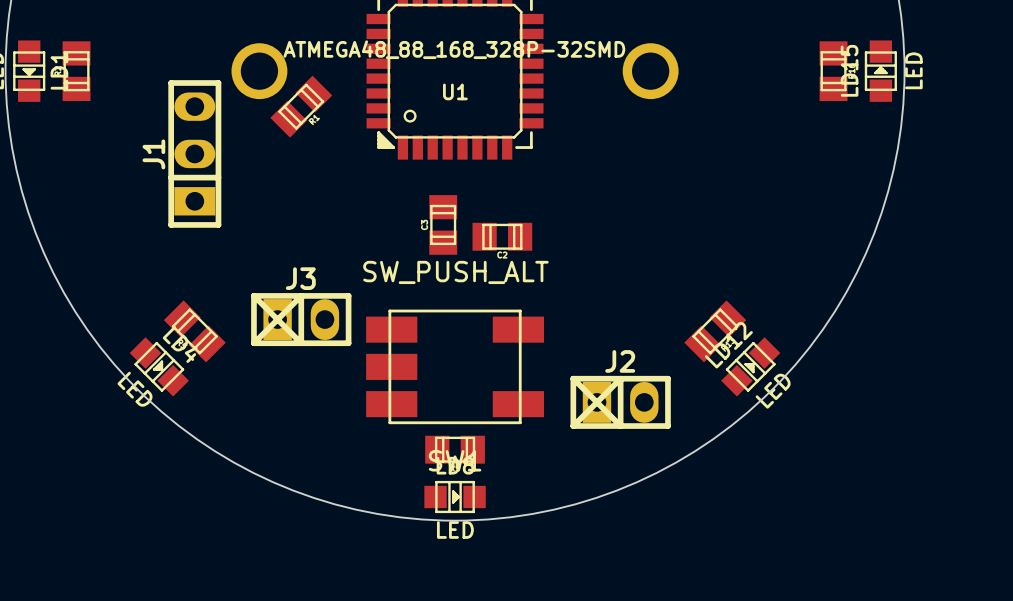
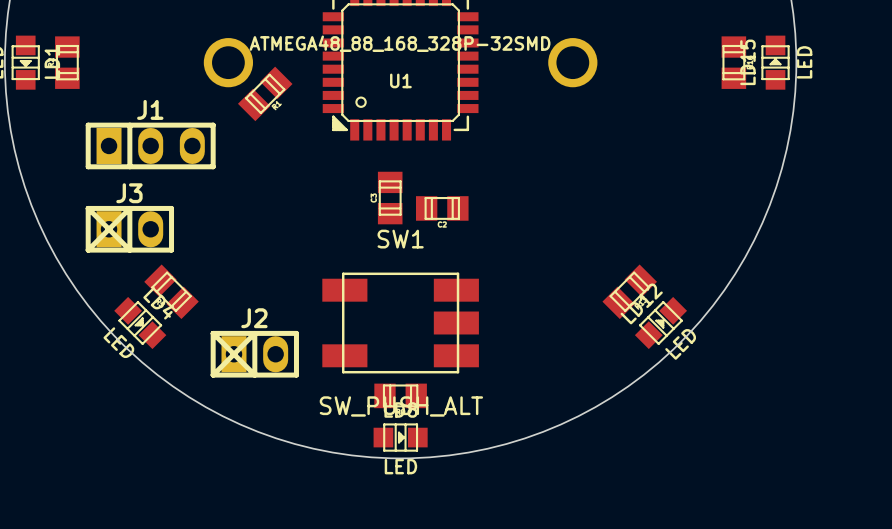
J1 rotation: 0° (194, 153) -> 90° clockwise (150, 145)
J3 position: (301, 319) -> (129, 229)
SW1 rotation: 0° (455, 366) -> 180° (400, 323)
J2 position: (620, 402) -> (254, 354)

